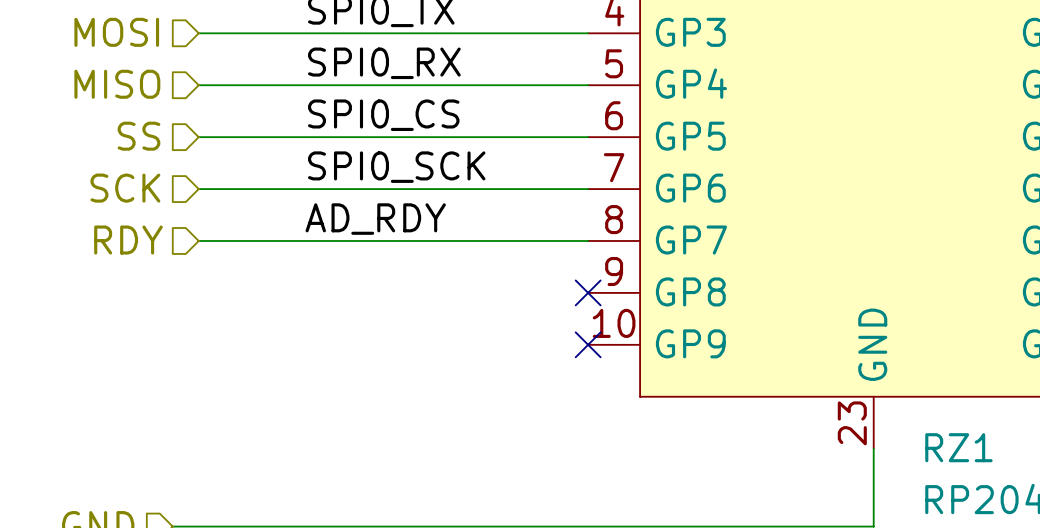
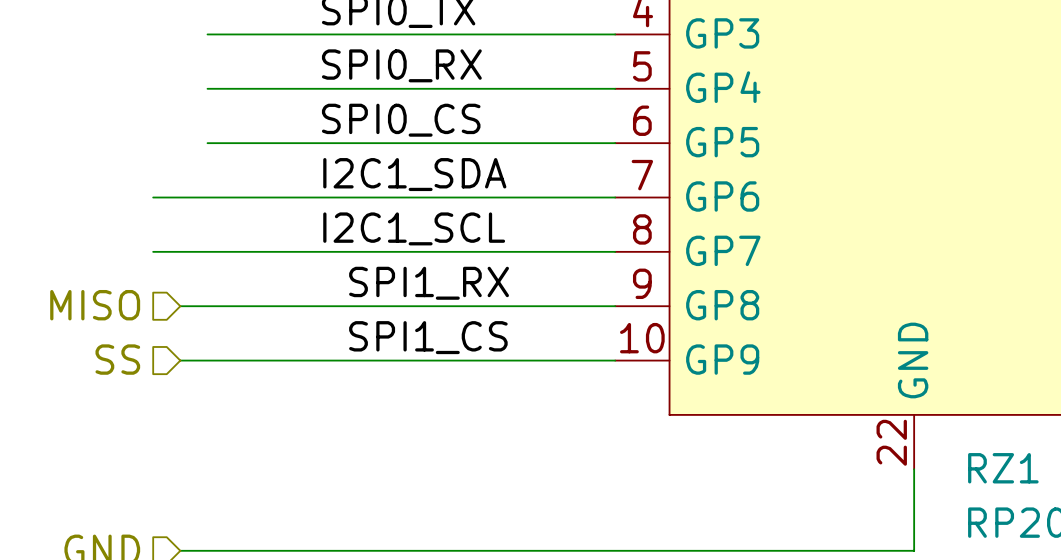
hierarchical label: MOSI (116, 32) -> none
hierarchical label position: MISO (117, 84) -> MISO (95, 305)
hierarchical label position: SS (138, 136) -> SS (117, 359)
label: SPI0_SCK (396, 167) -> I2C1_SDA (414, 174)
hierarchical label: SCK (125, 188) -> none
wire: none -> (153, 197) (207, 197)
label: AD_RDY (375, 219) -> I2C1_SCL (414, 228)
hierarchical label: RDY (128, 240) -> none
wire: none -> (153, 251) (207, 251)
label: none -> SPI1_RX (429, 283)
wire: none -> (180, 306) (615, 306)
no-connect mark: (588, 292) -> none
label: none -> SPI1_CS (428, 337)
wire: none -> (180, 360) (615, 360)
no-connect mark: (588, 344) -> none
RZ1 pin number: 23 (852, 423) -> 22 (891, 442)

